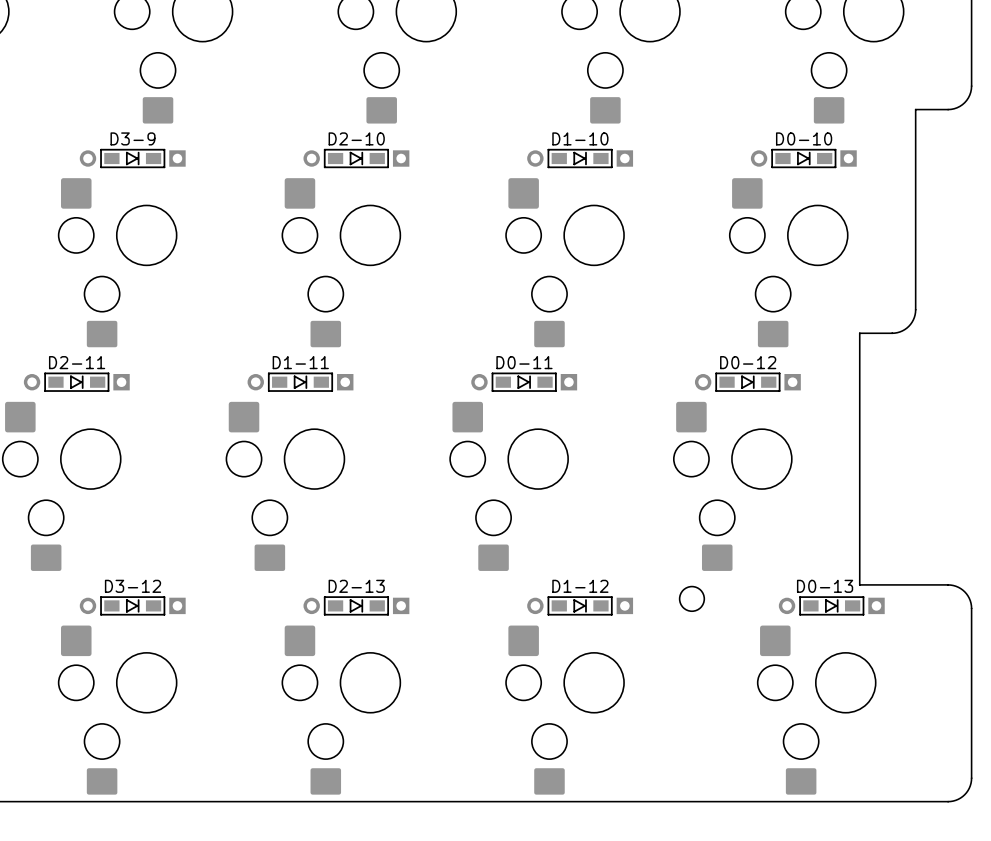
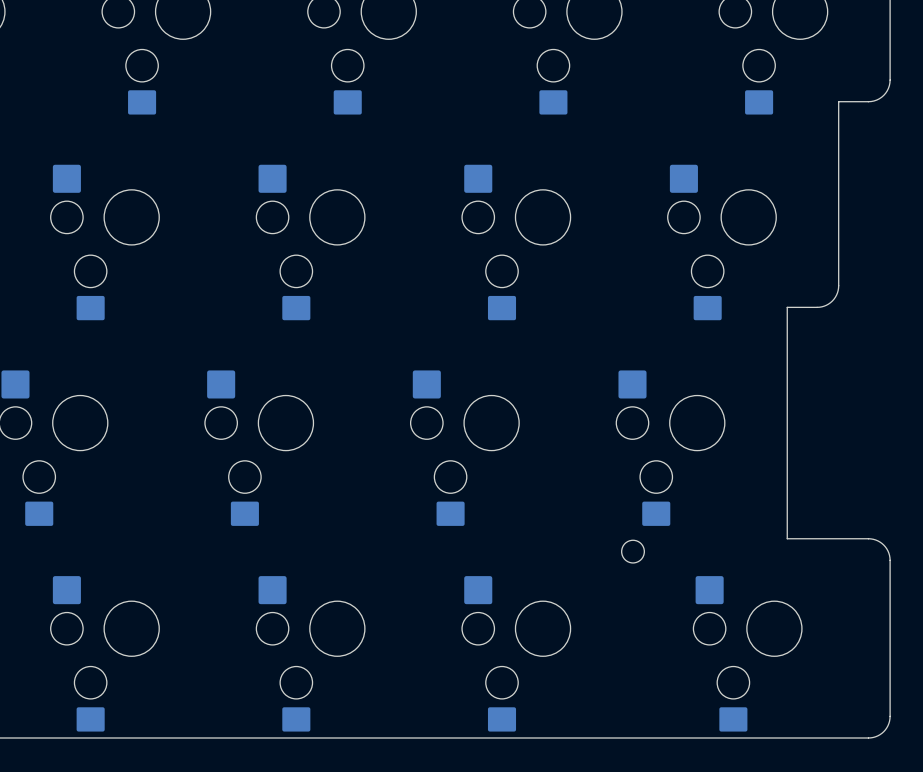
D3-9: (132, 158) -> none
D2-10: (356, 158) -> none
D1-10: (580, 158) -> none
D0-10: (803, 158) -> none
D2-11: (76, 382) -> none
D1-11: (300, 382) -> none
D0-11: (524, 382) -> none
D0-12: (747, 382) -> none
D3-12: (132, 605) -> none
D2-13: (356, 605) -> none
D1-12: (580, 605) -> none
D0-13: (831, 605) -> none

